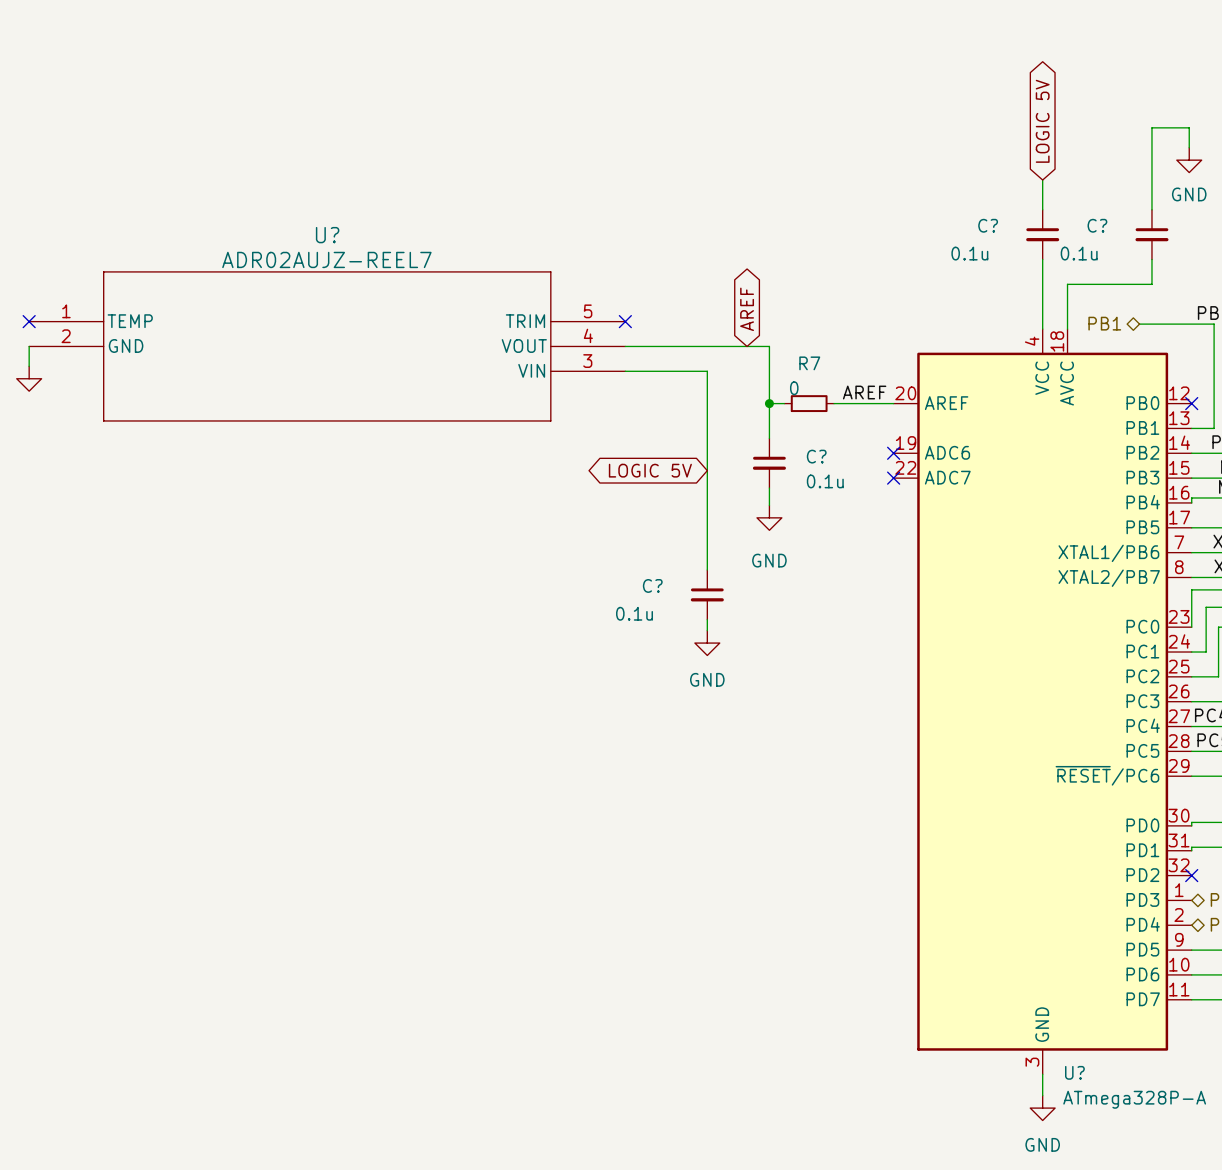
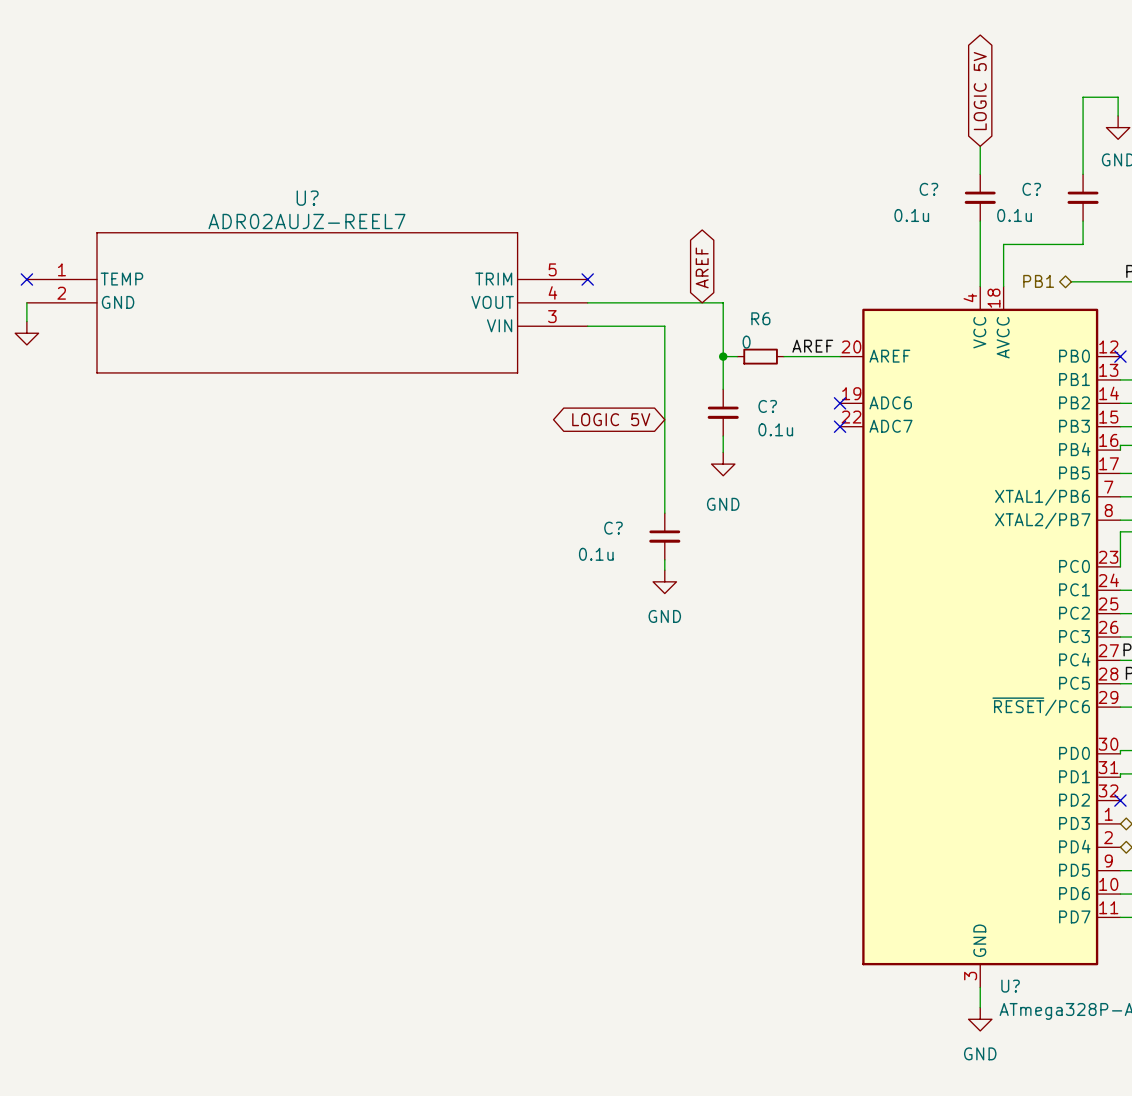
R7 name: R7 (809, 363) -> R6 (760, 318)

